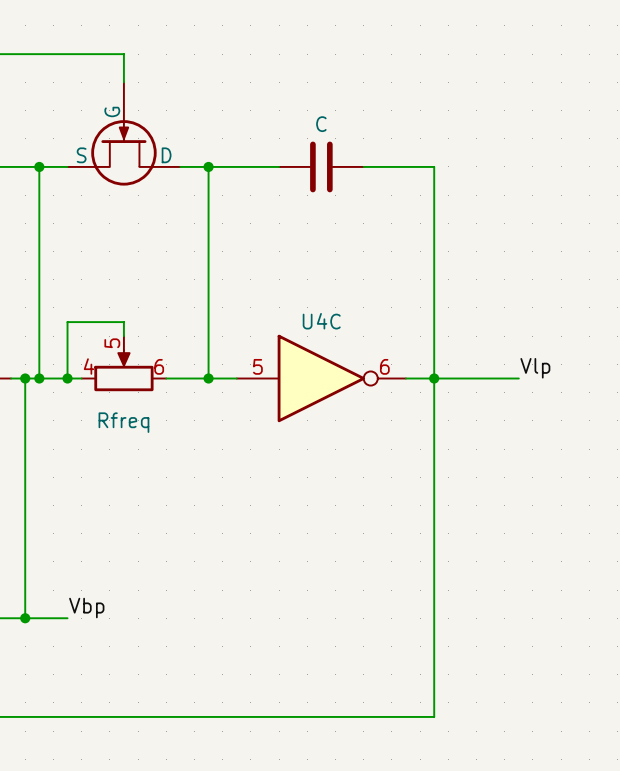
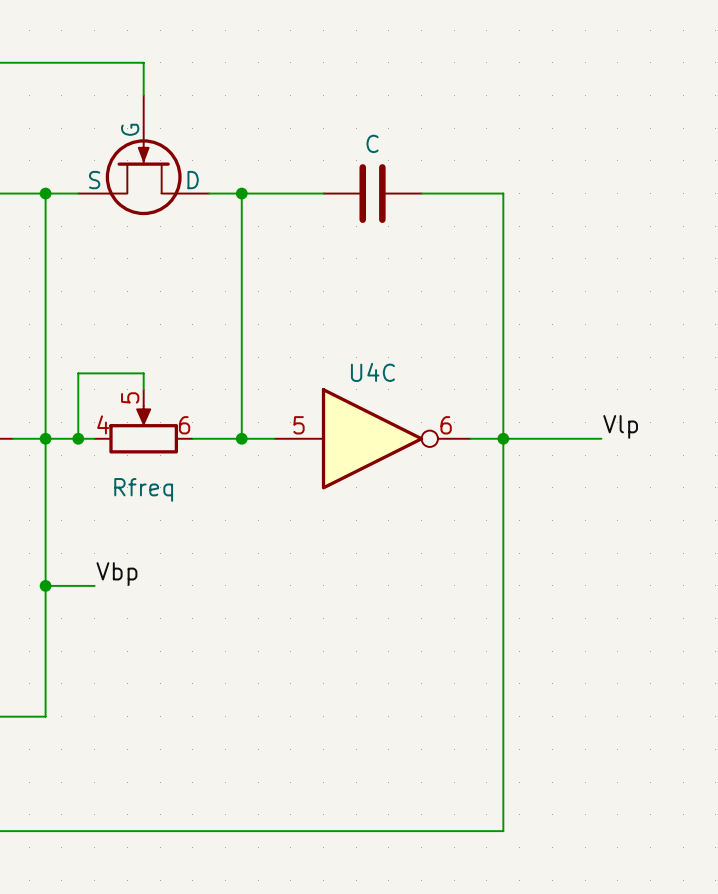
wire: (25, 378) (25, 618) -> none
junction: (25, 378) -> none
wire: none -> (45, 585) (94, 585)
junction: none -> (45, 585)
label position: Vbp (86, 608) -> Vbp (116, 574)
junction: (25, 618) -> none
wire: (39, 618) (67, 618) -> (45, 716) (45, 438)

